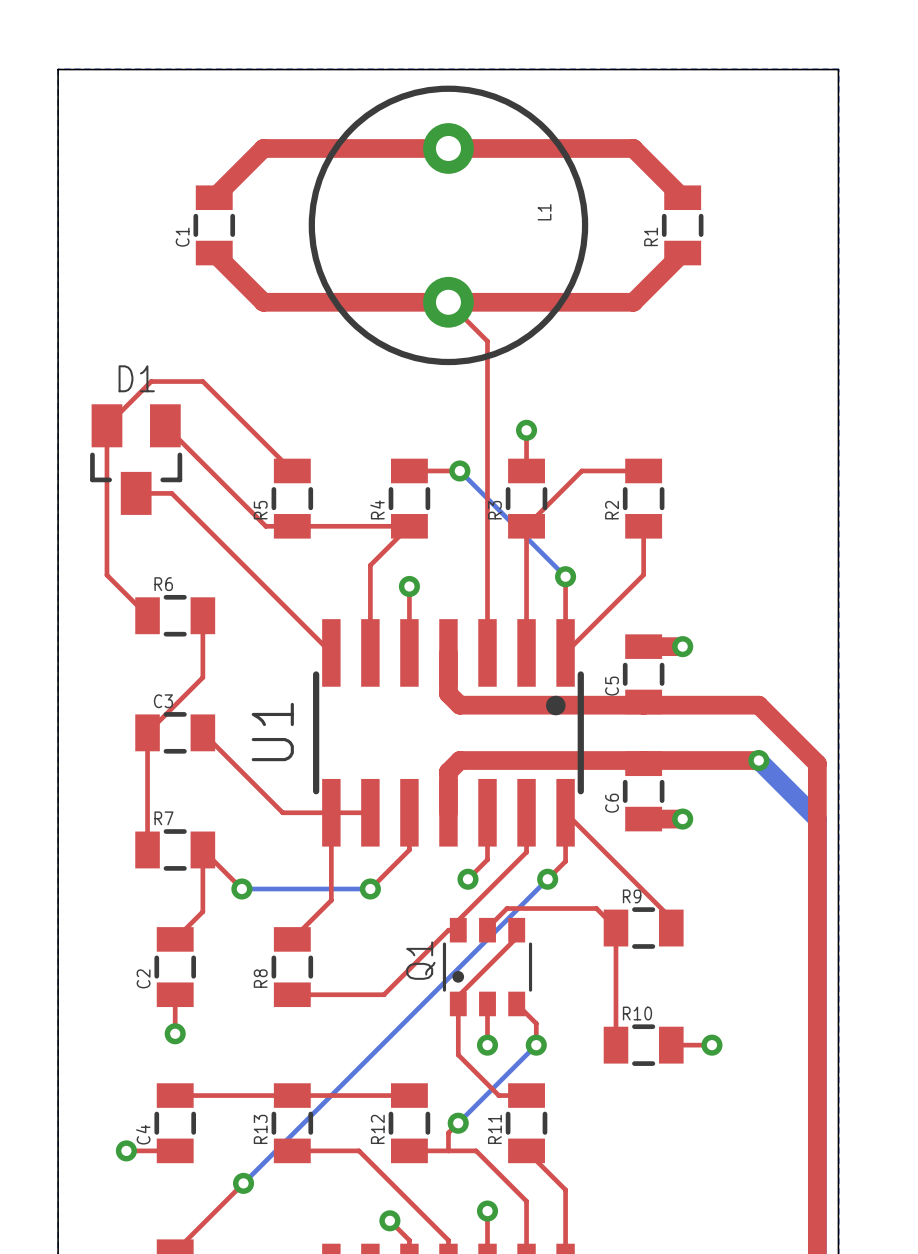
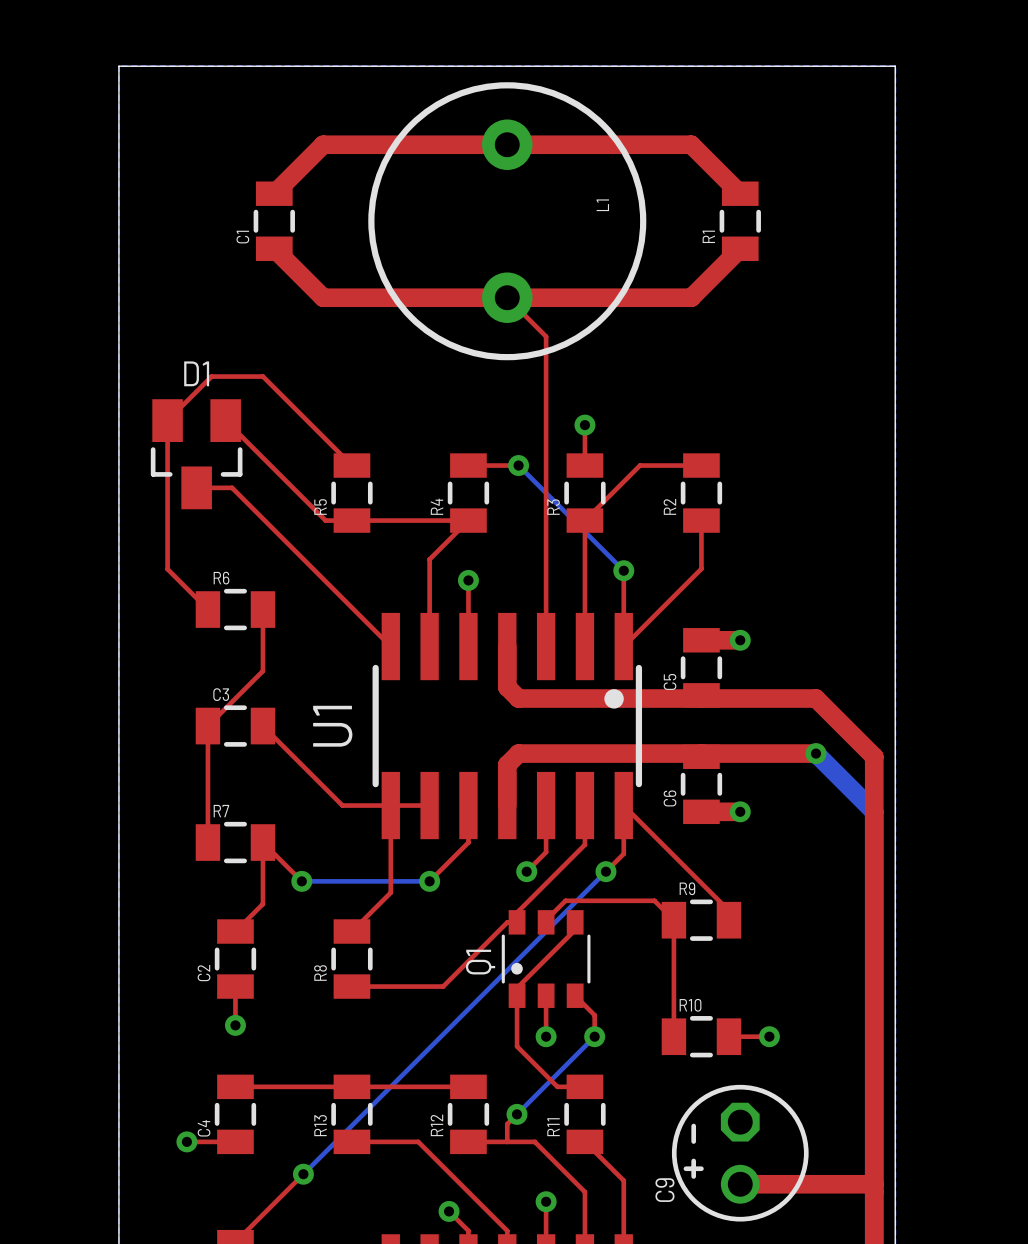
C9: none -> (740, 1153)
top track: none -> (740, 1184) (874, 1184)

